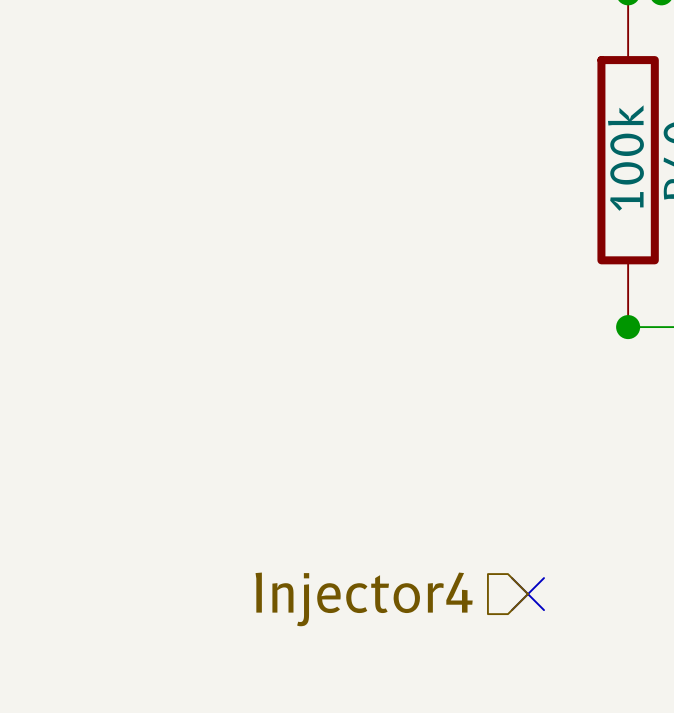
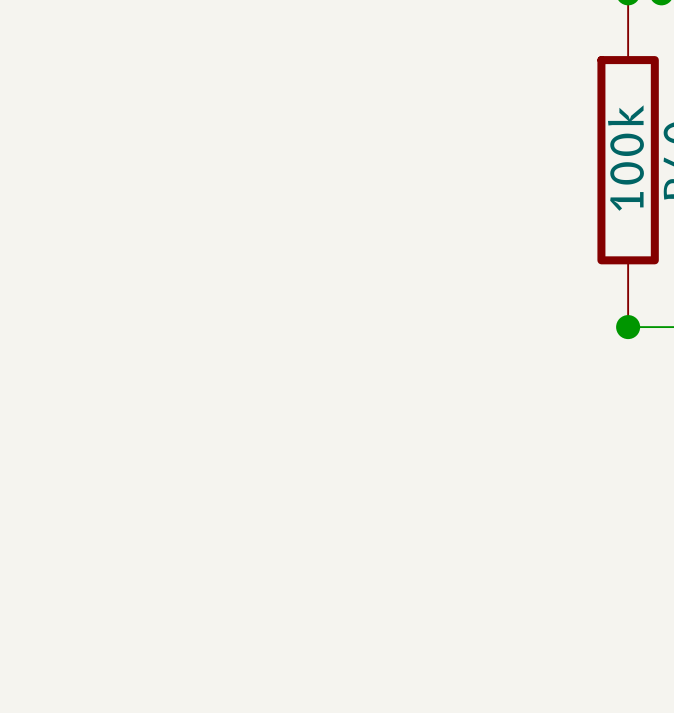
no-connect mark: (527, 594) -> none
hierarchical label: Injector4 (364, 599) -> none

